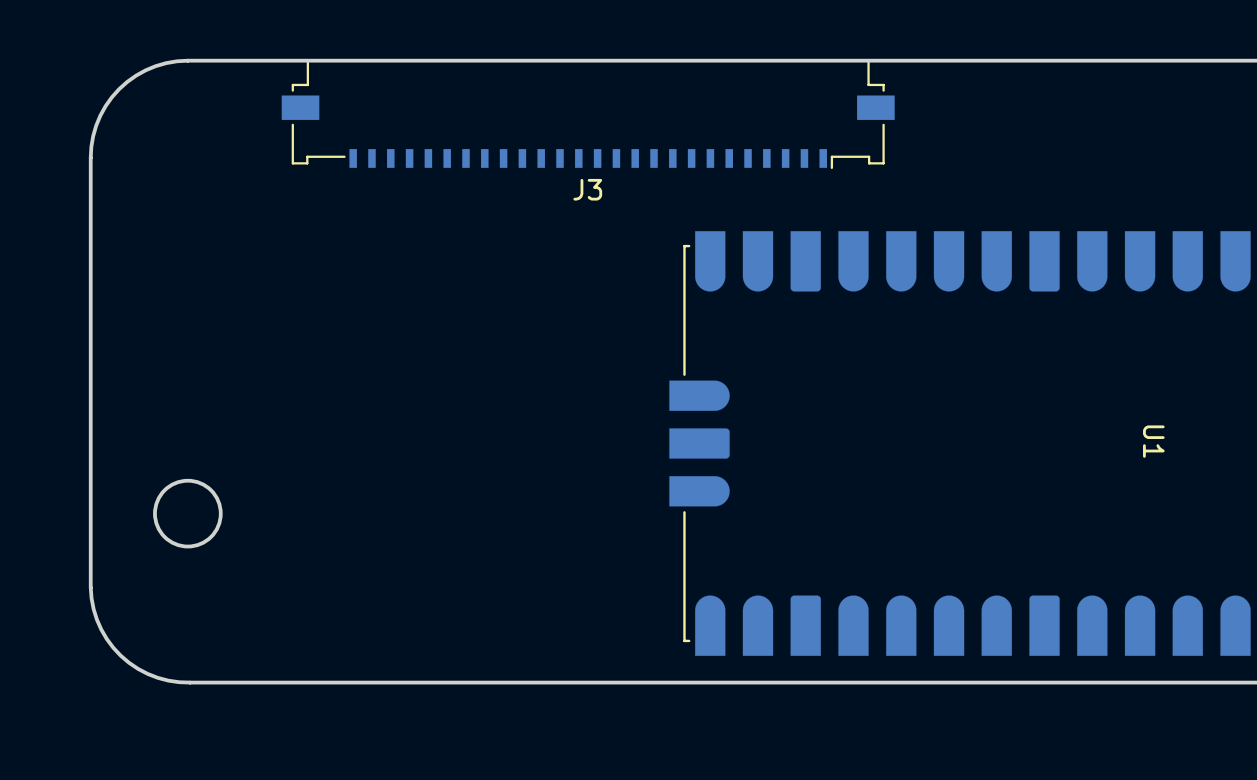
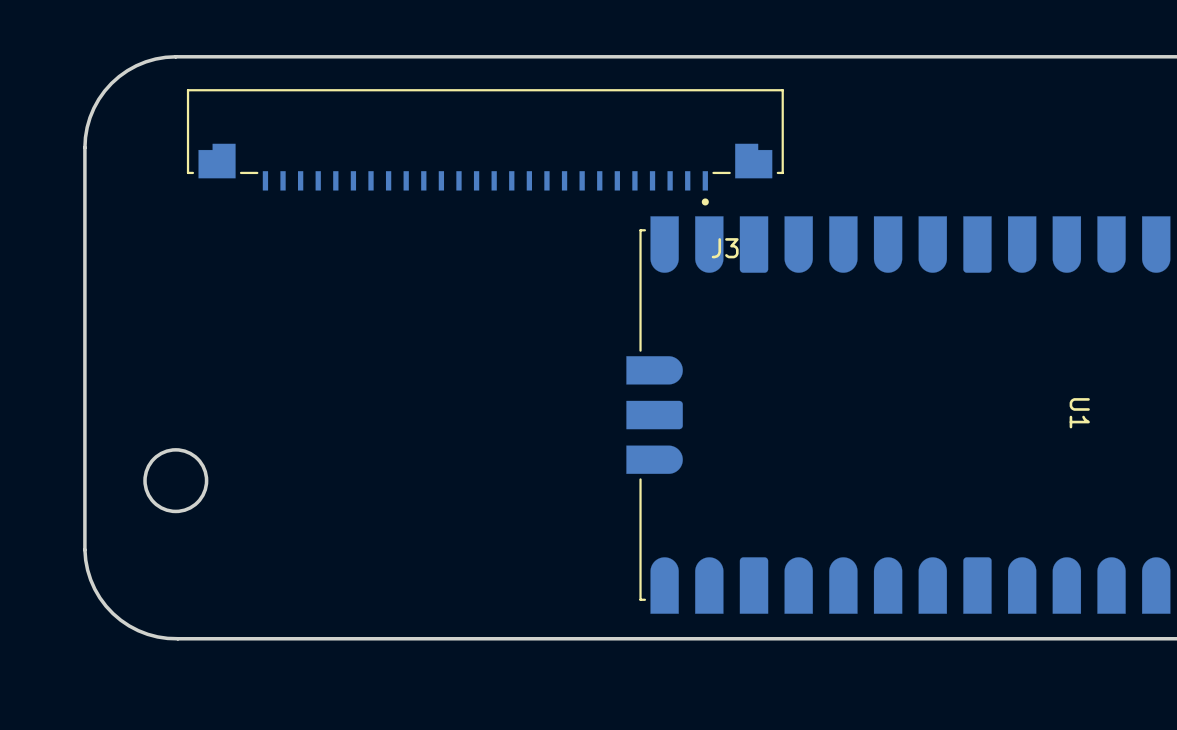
J3 footprint: [281, 59, 895, 170] -> [186, 89, 784, 206]
J3 name position: J3 (587, 189) -> J3 (725, 248)

